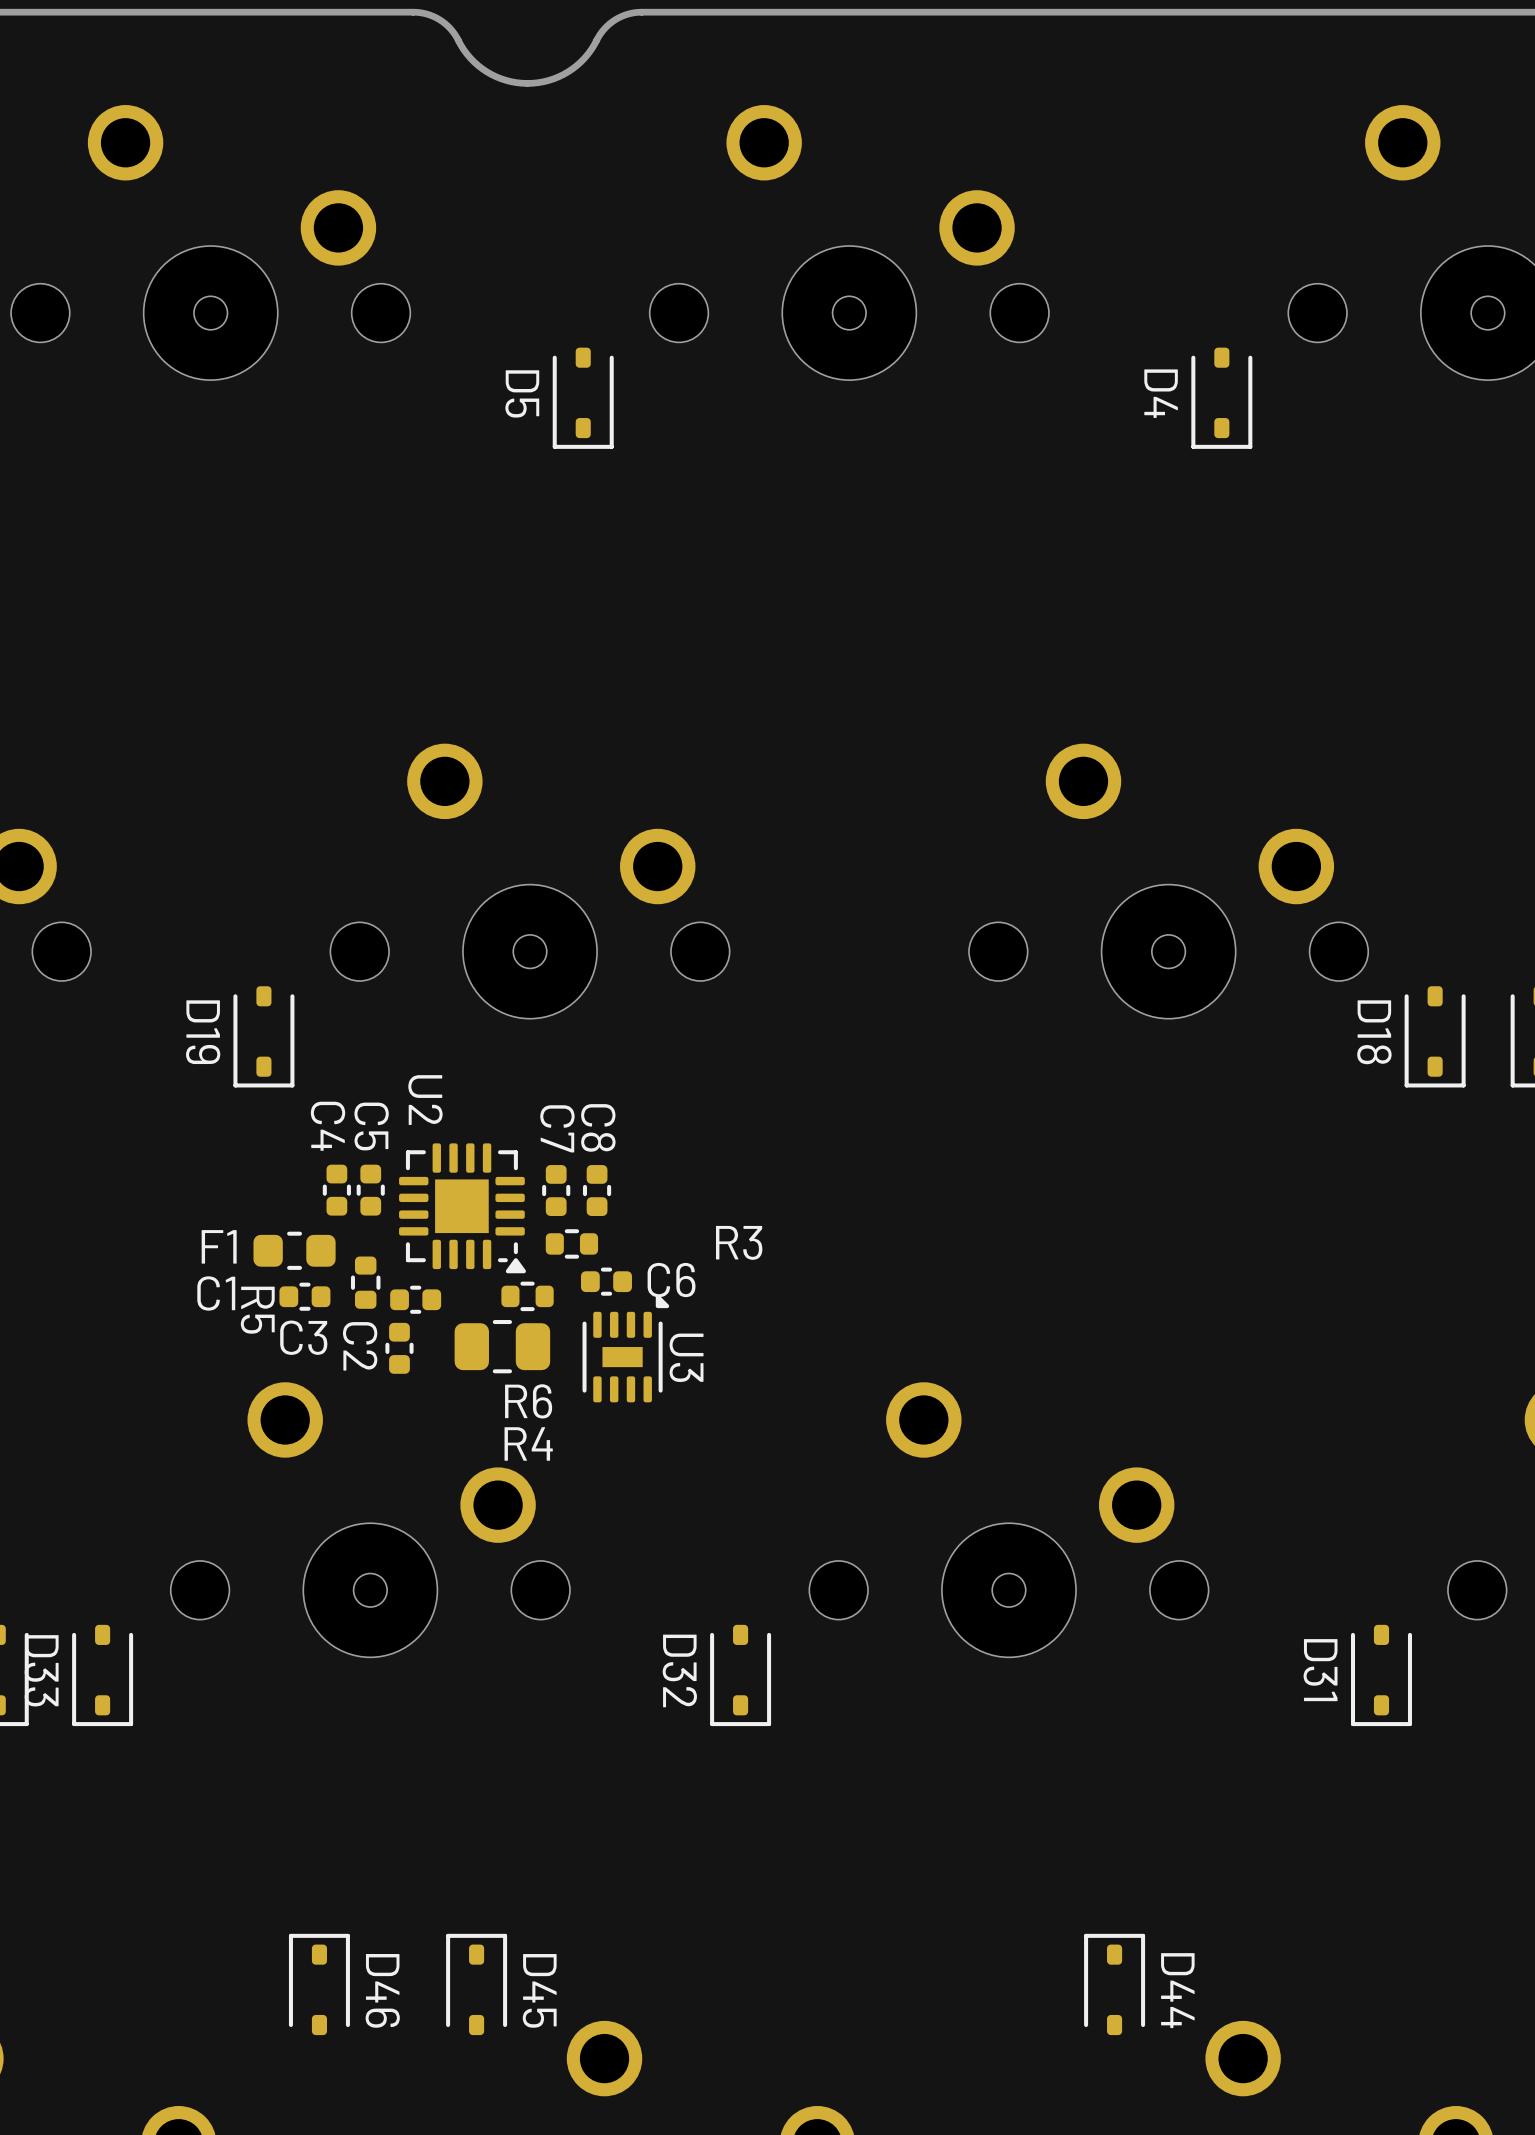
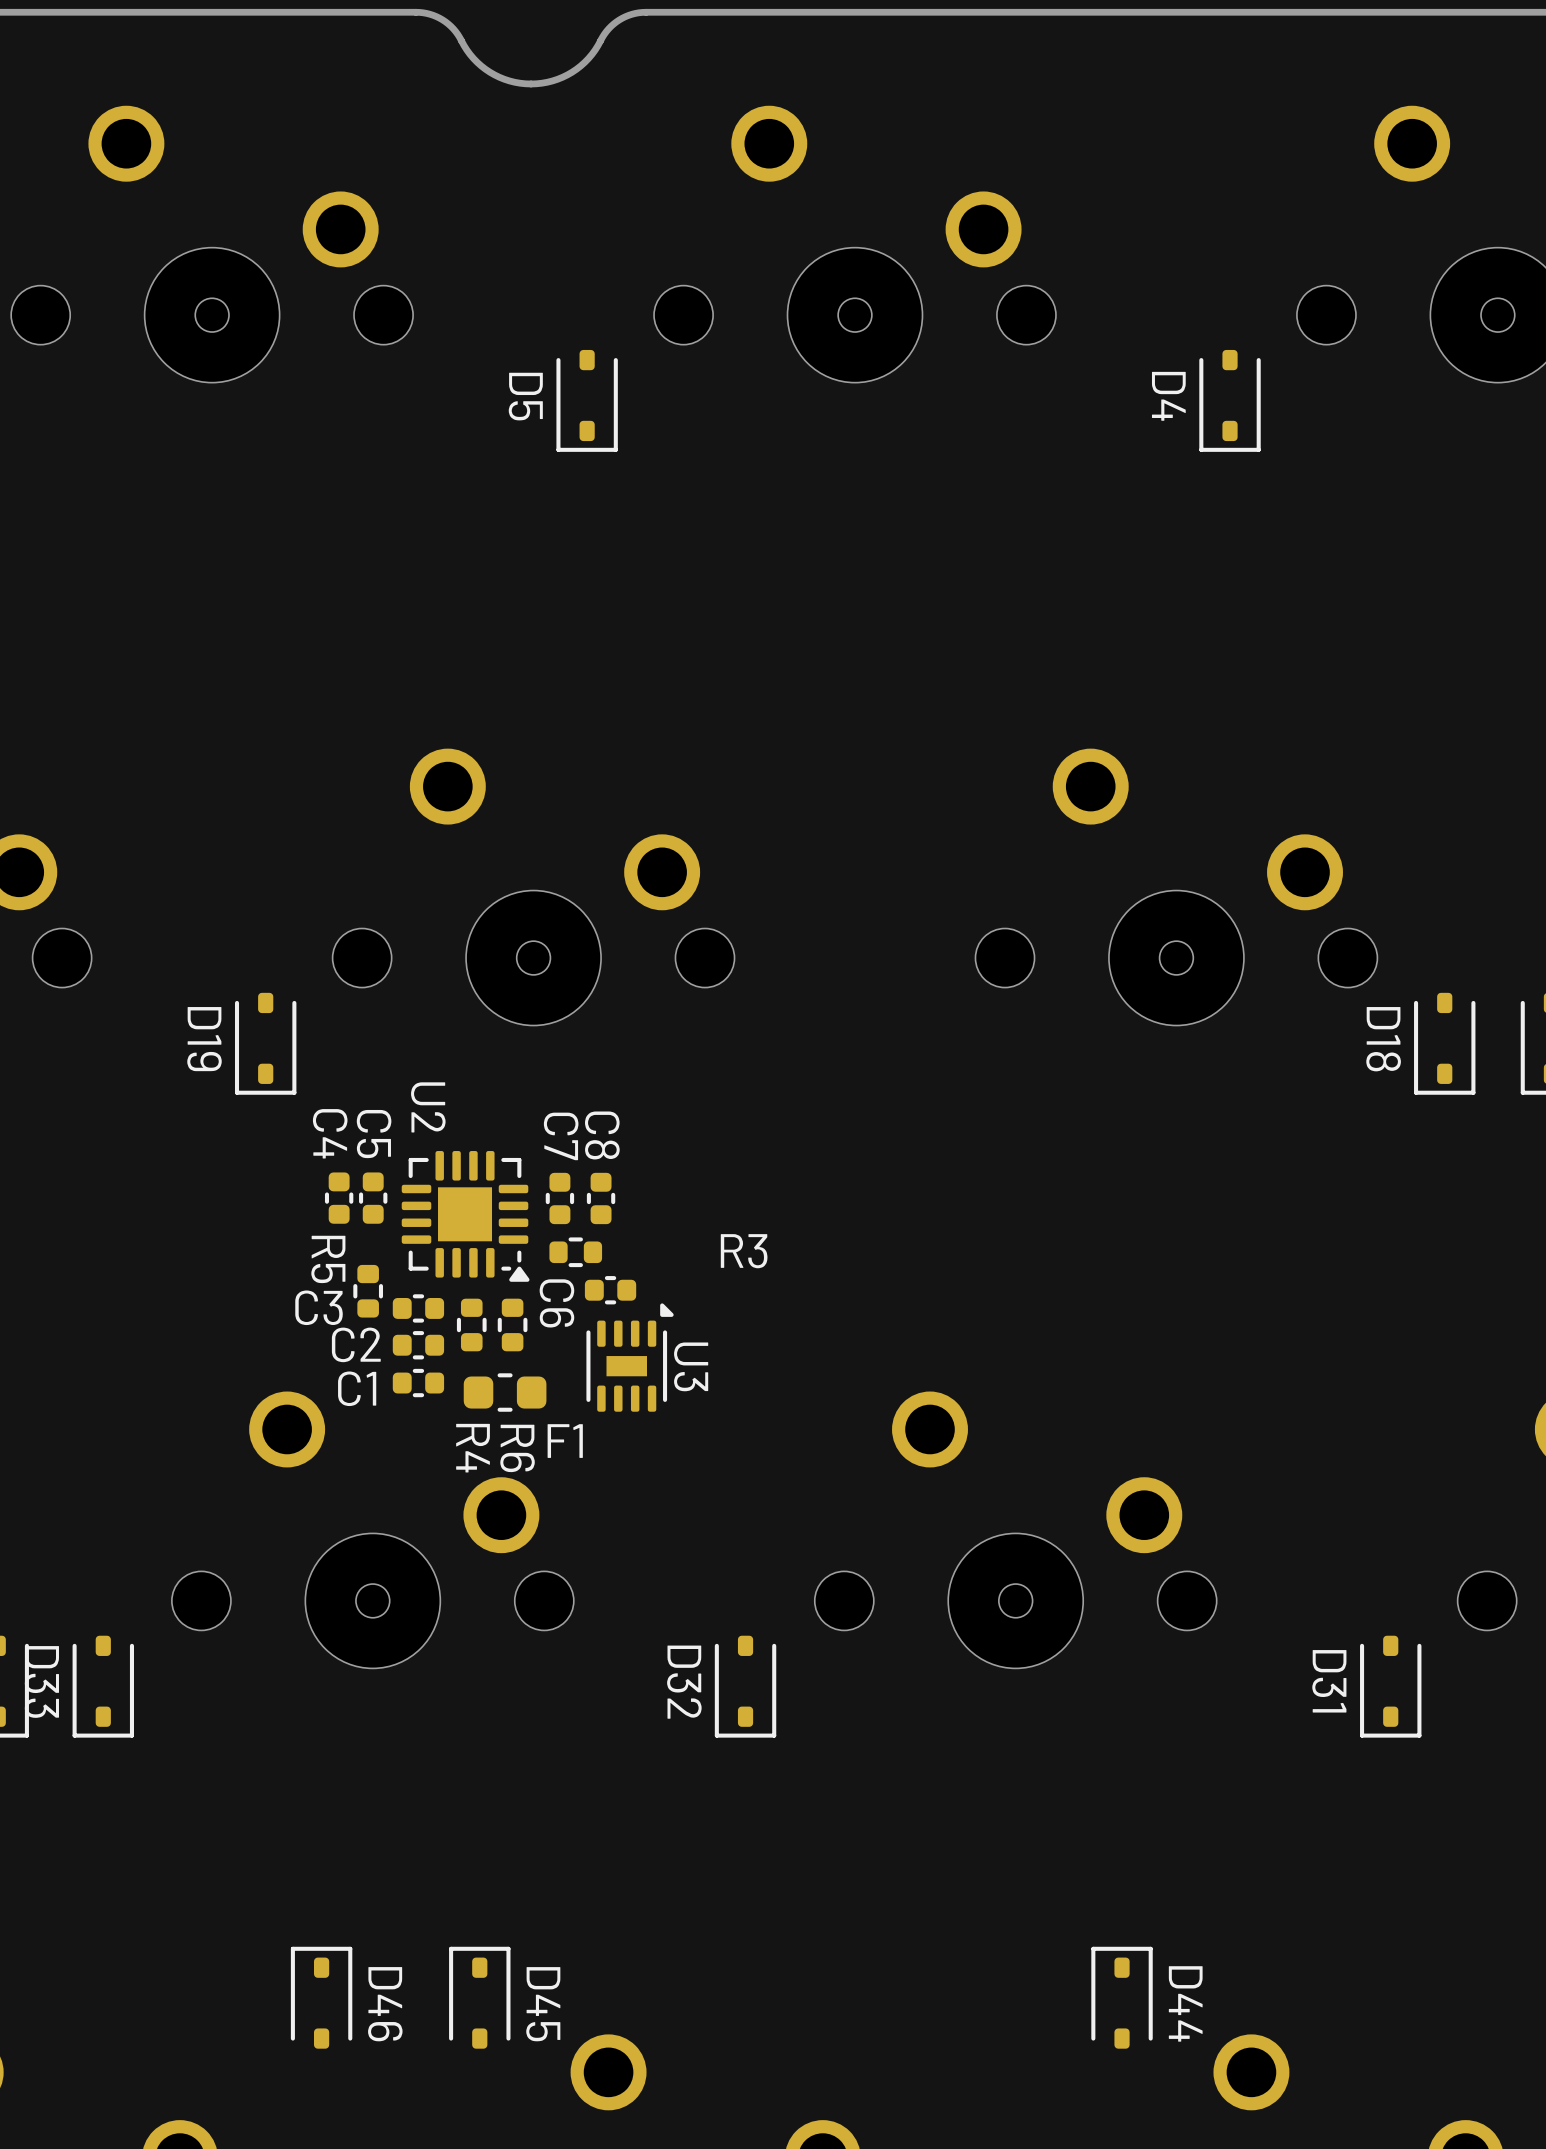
F1 name position: F1 (219, 1246) -> F1 (565, 1441)
F1 position: (294, 1250) -> (505, 1392)
C6 name rotation: 0° (671, 1280) -> 90° clockwise (556, 1303)
C6 name position: C6 (671, 1280) -> C6 (556, 1303)
C1 name position: C1 (216, 1293) -> C1 (357, 1388)
C1 position: (304, 1296) -> (418, 1383)
R6 rotation: 0° (527, 1296) -> 90° clockwise (512, 1324)
R5 name position: R5 (257, 1310) -> R5 (328, 1259)
R4 footprint: [454, 1320, 551, 1374] -> [456, 1298, 487, 1352]
C3 name position: C3 (303, 1337) -> C3 (319, 1307)
C2 rotation: 0° (399, 1348) -> 90° clockwise (418, 1345)

